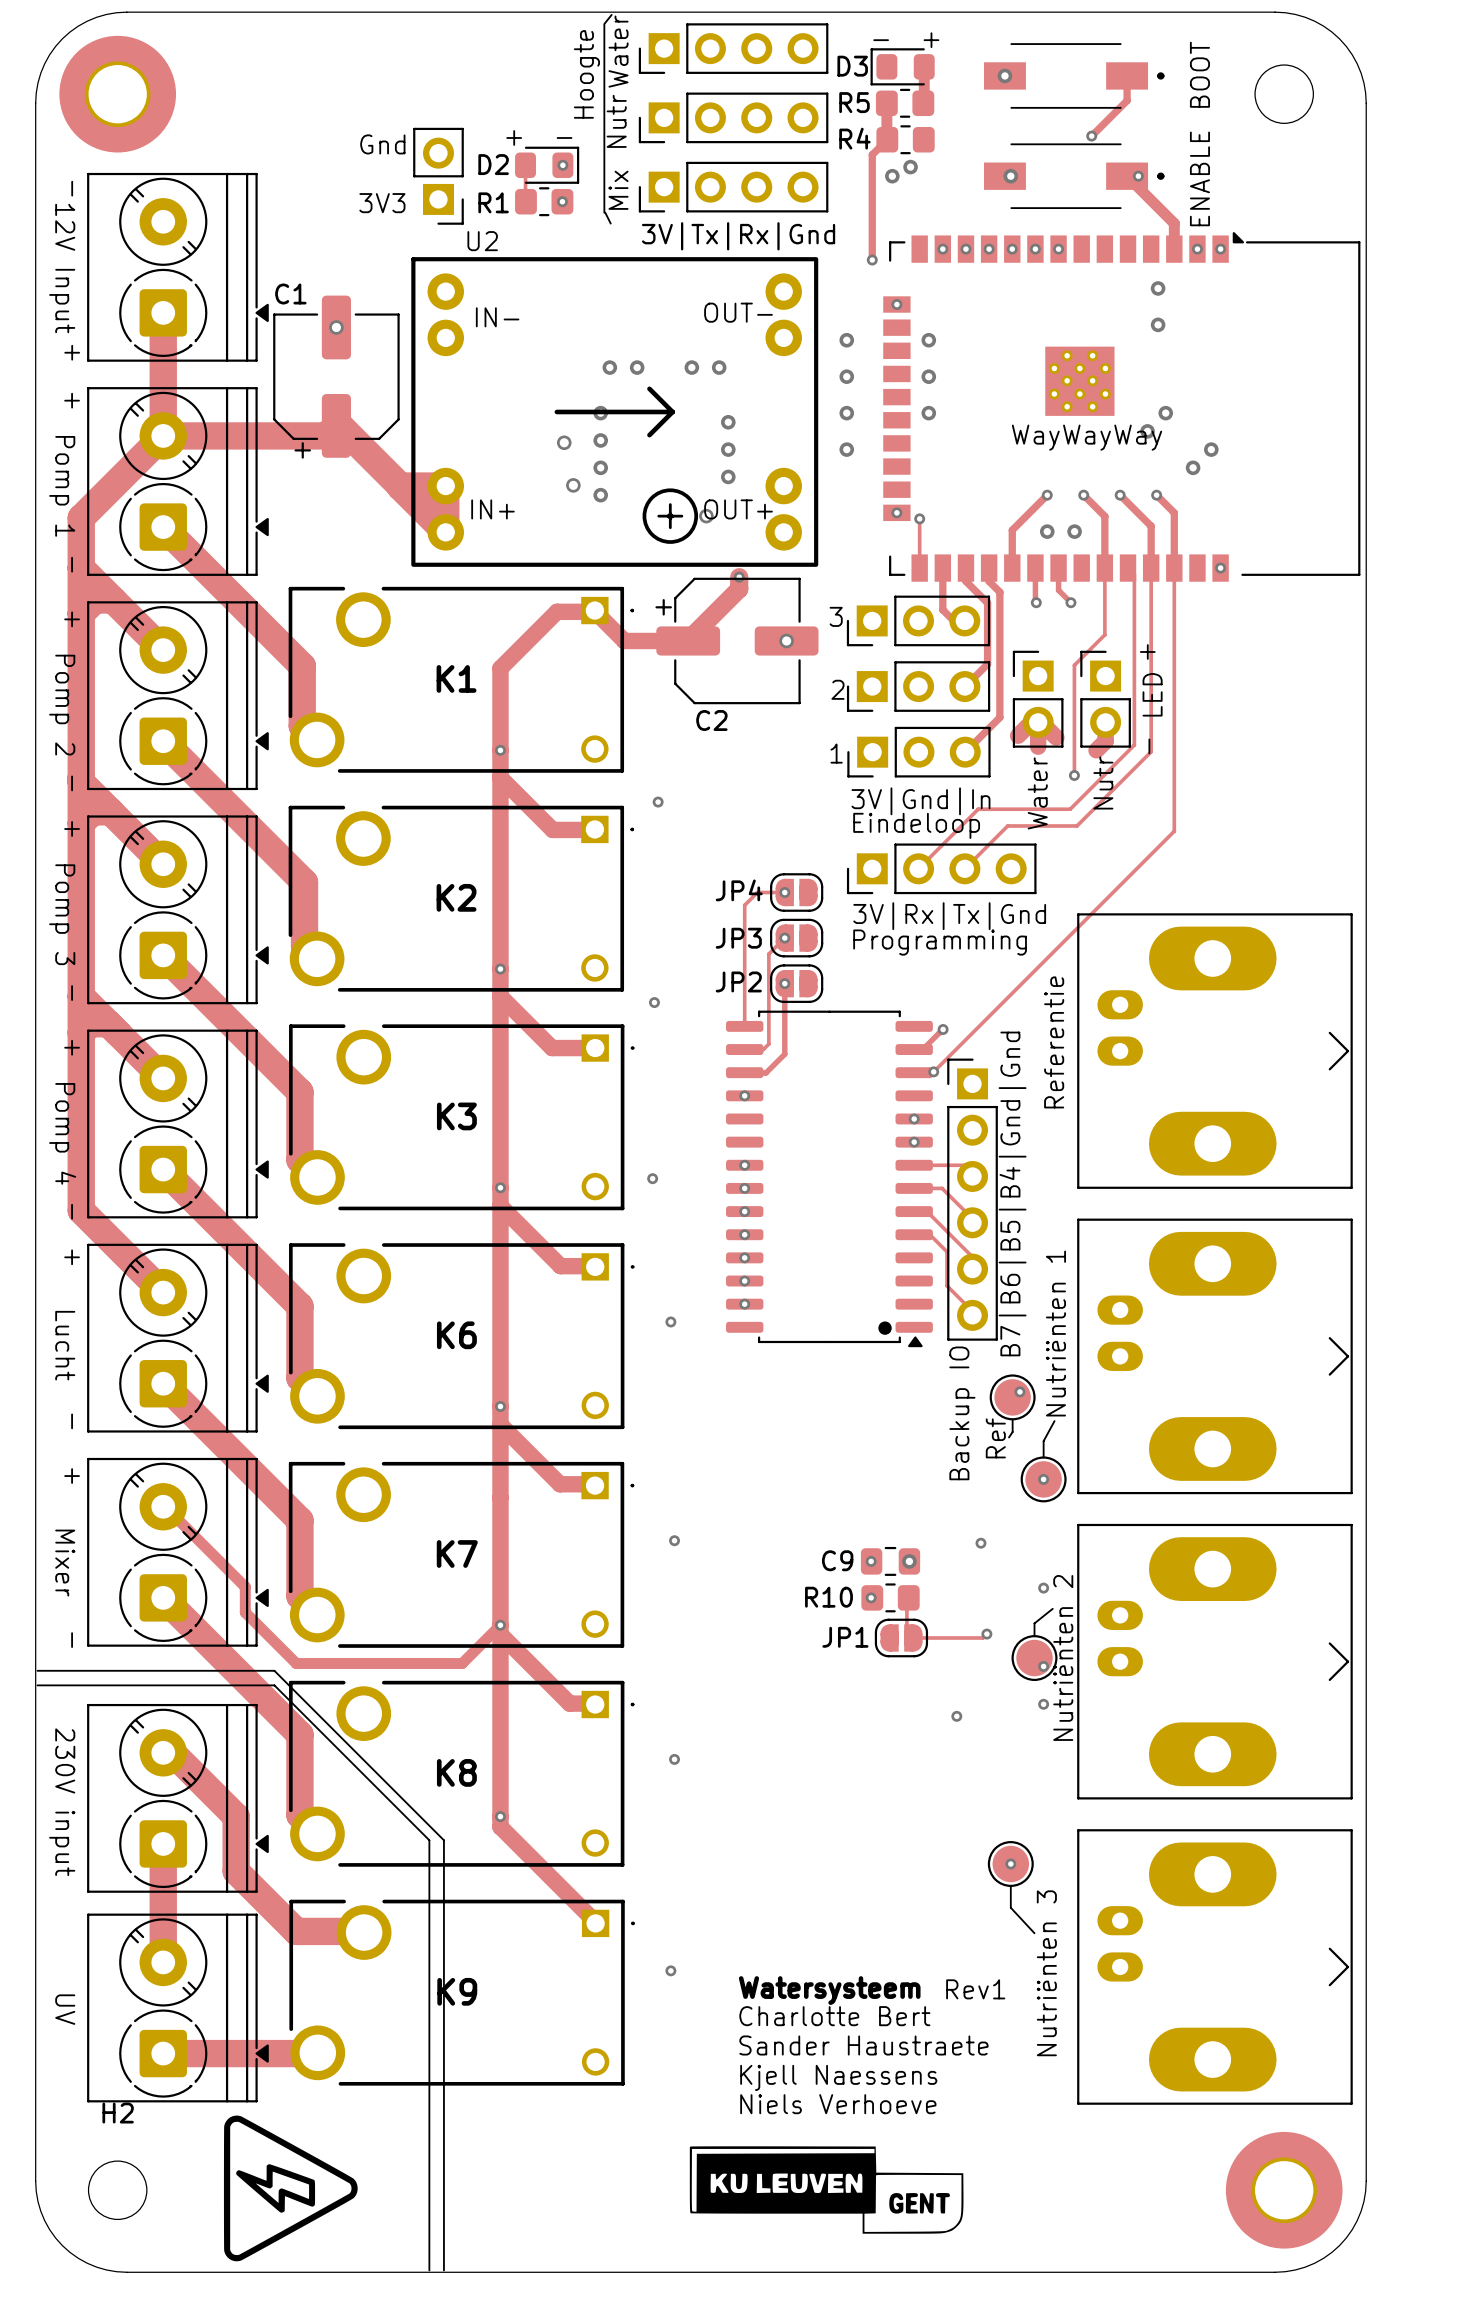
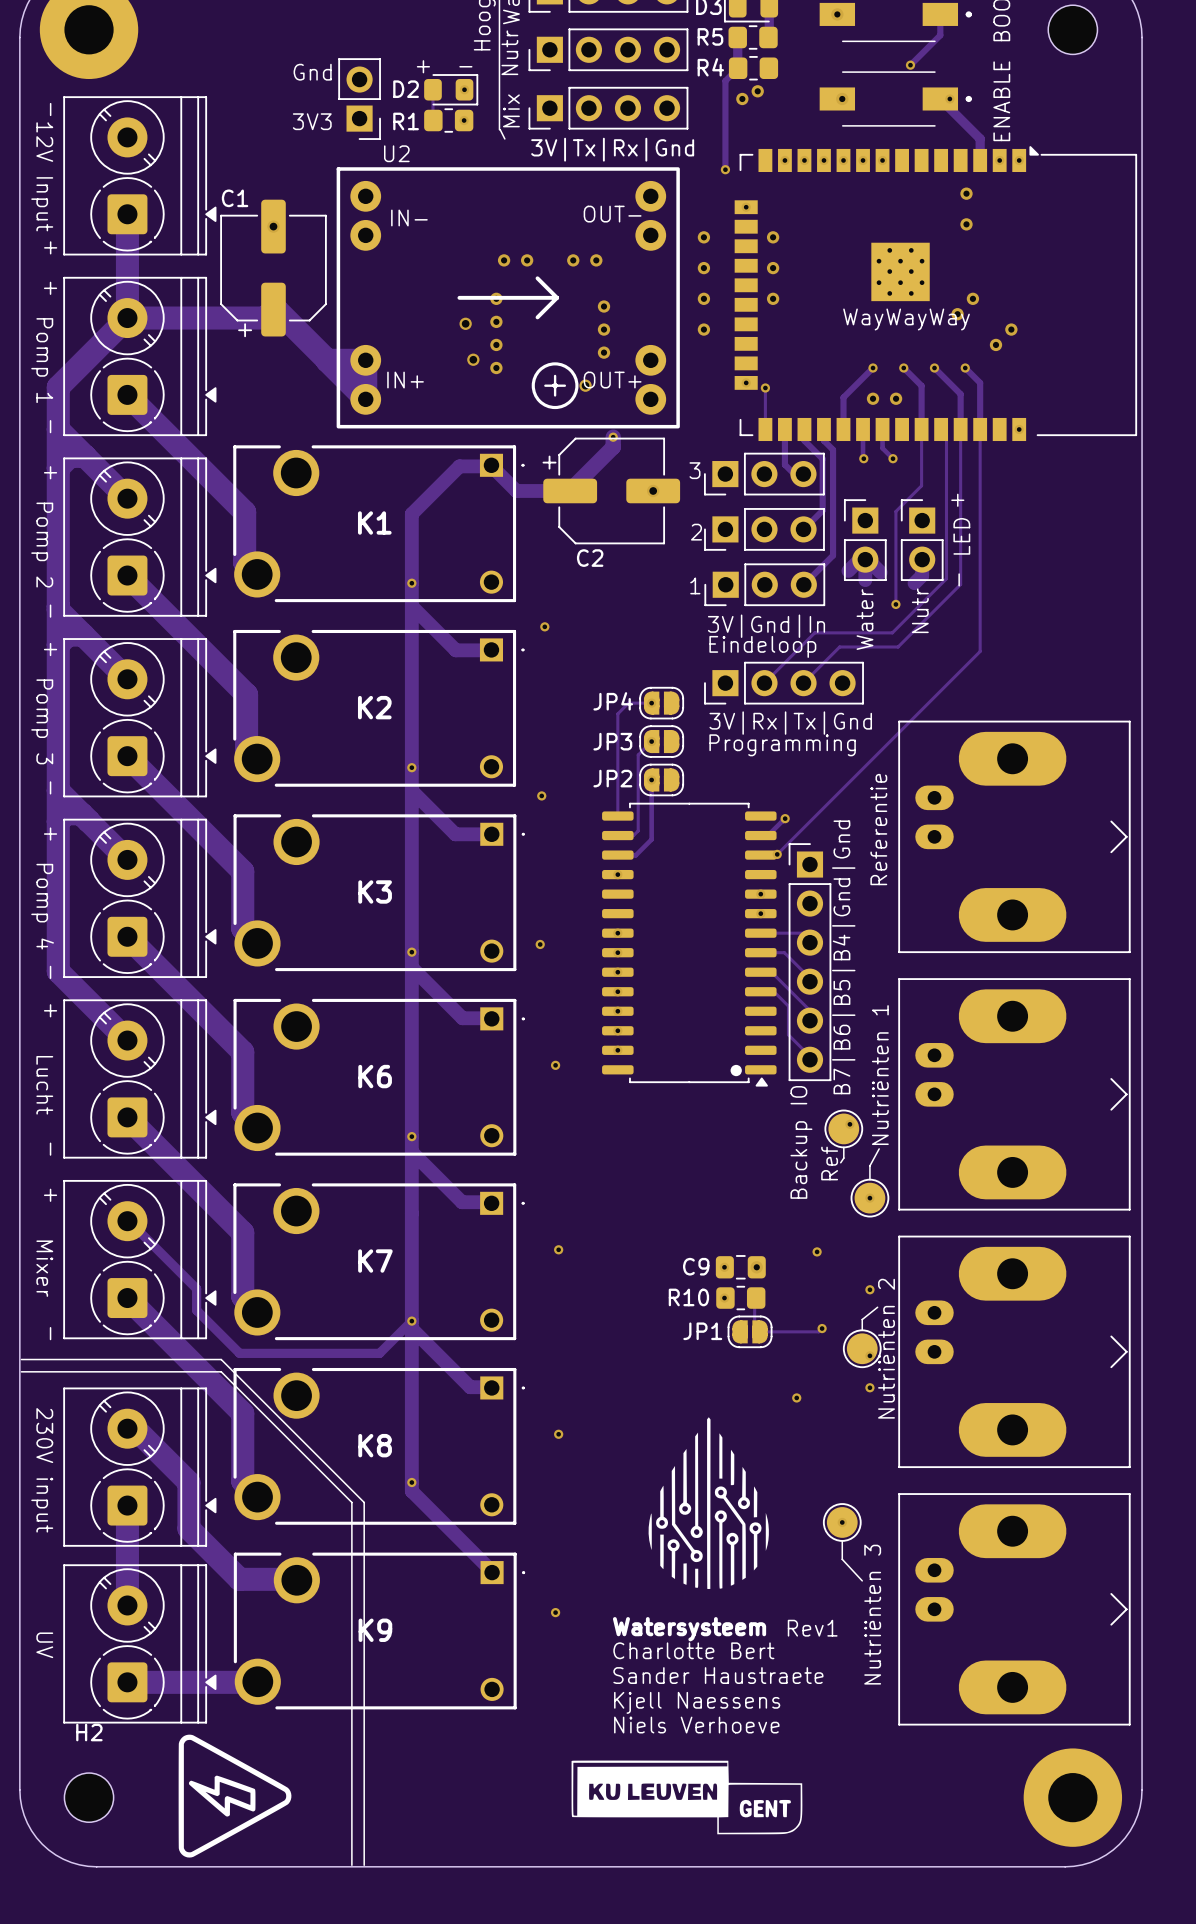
drawing: none -> [648, 1417, 769, 1590]

